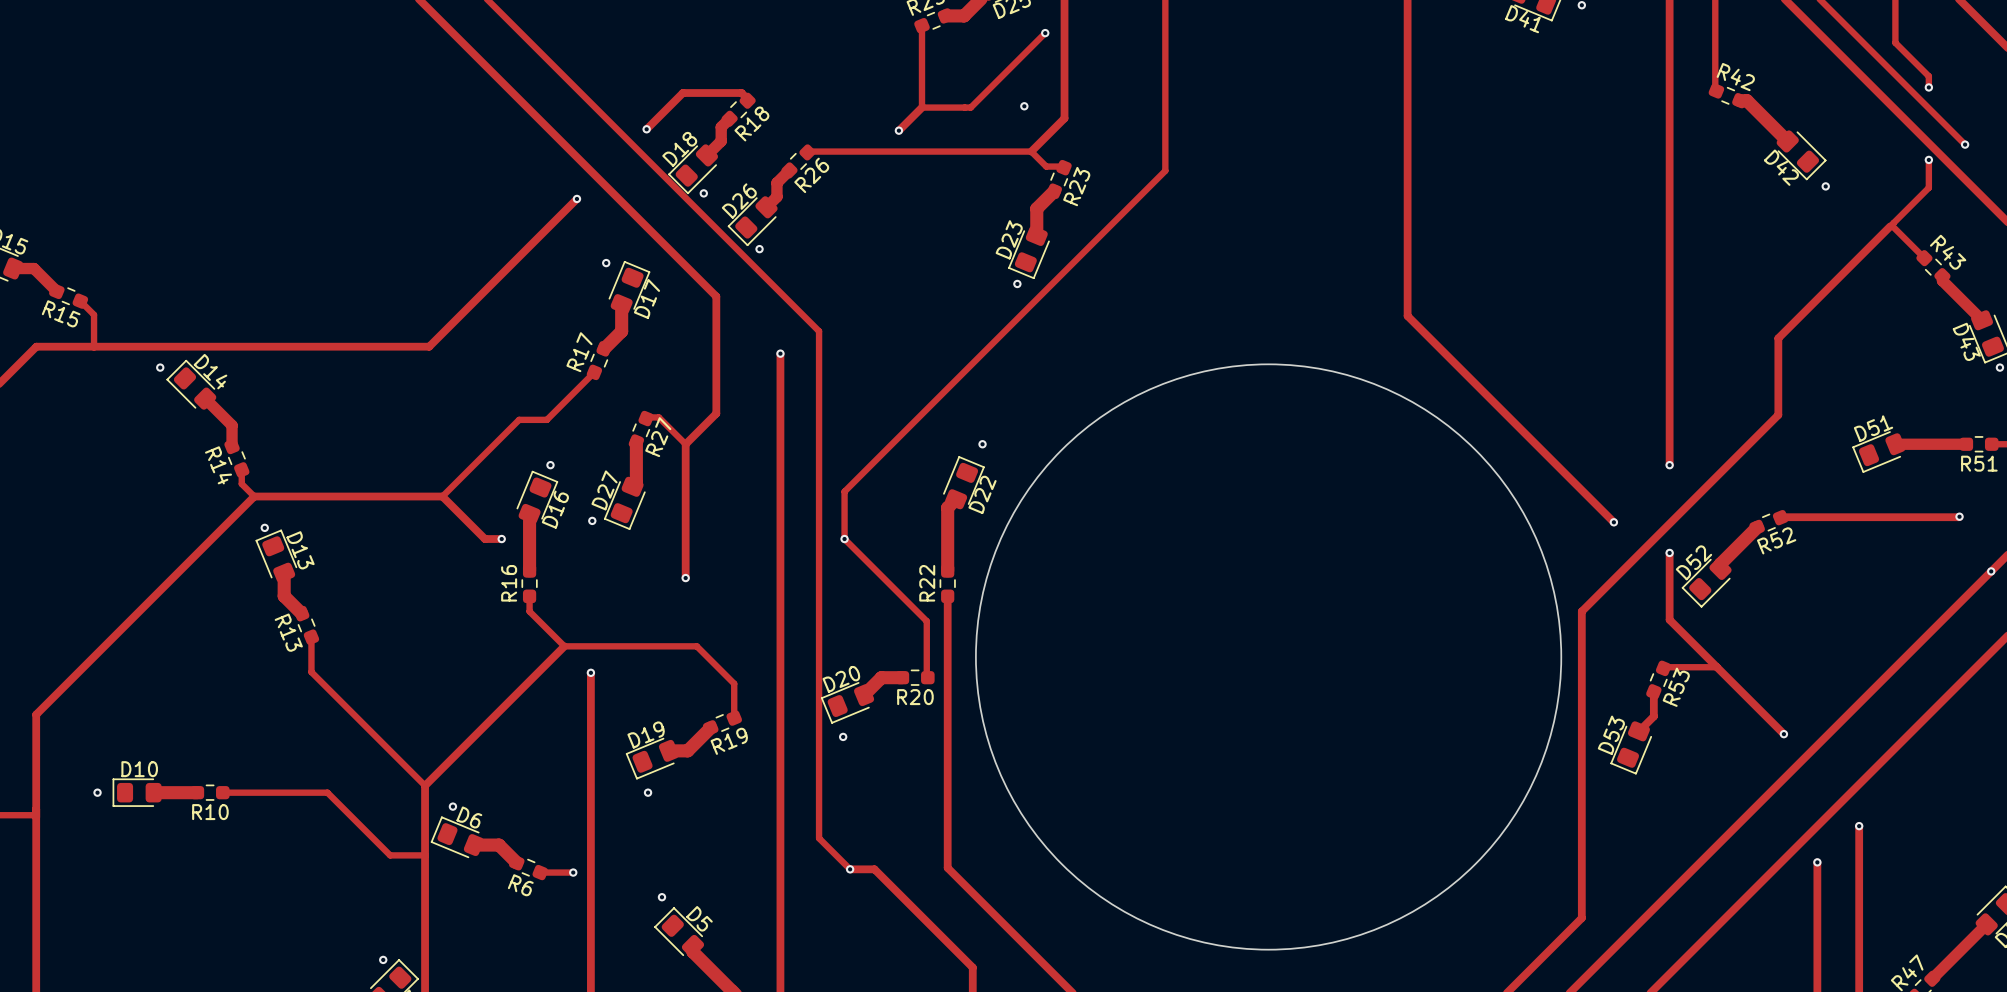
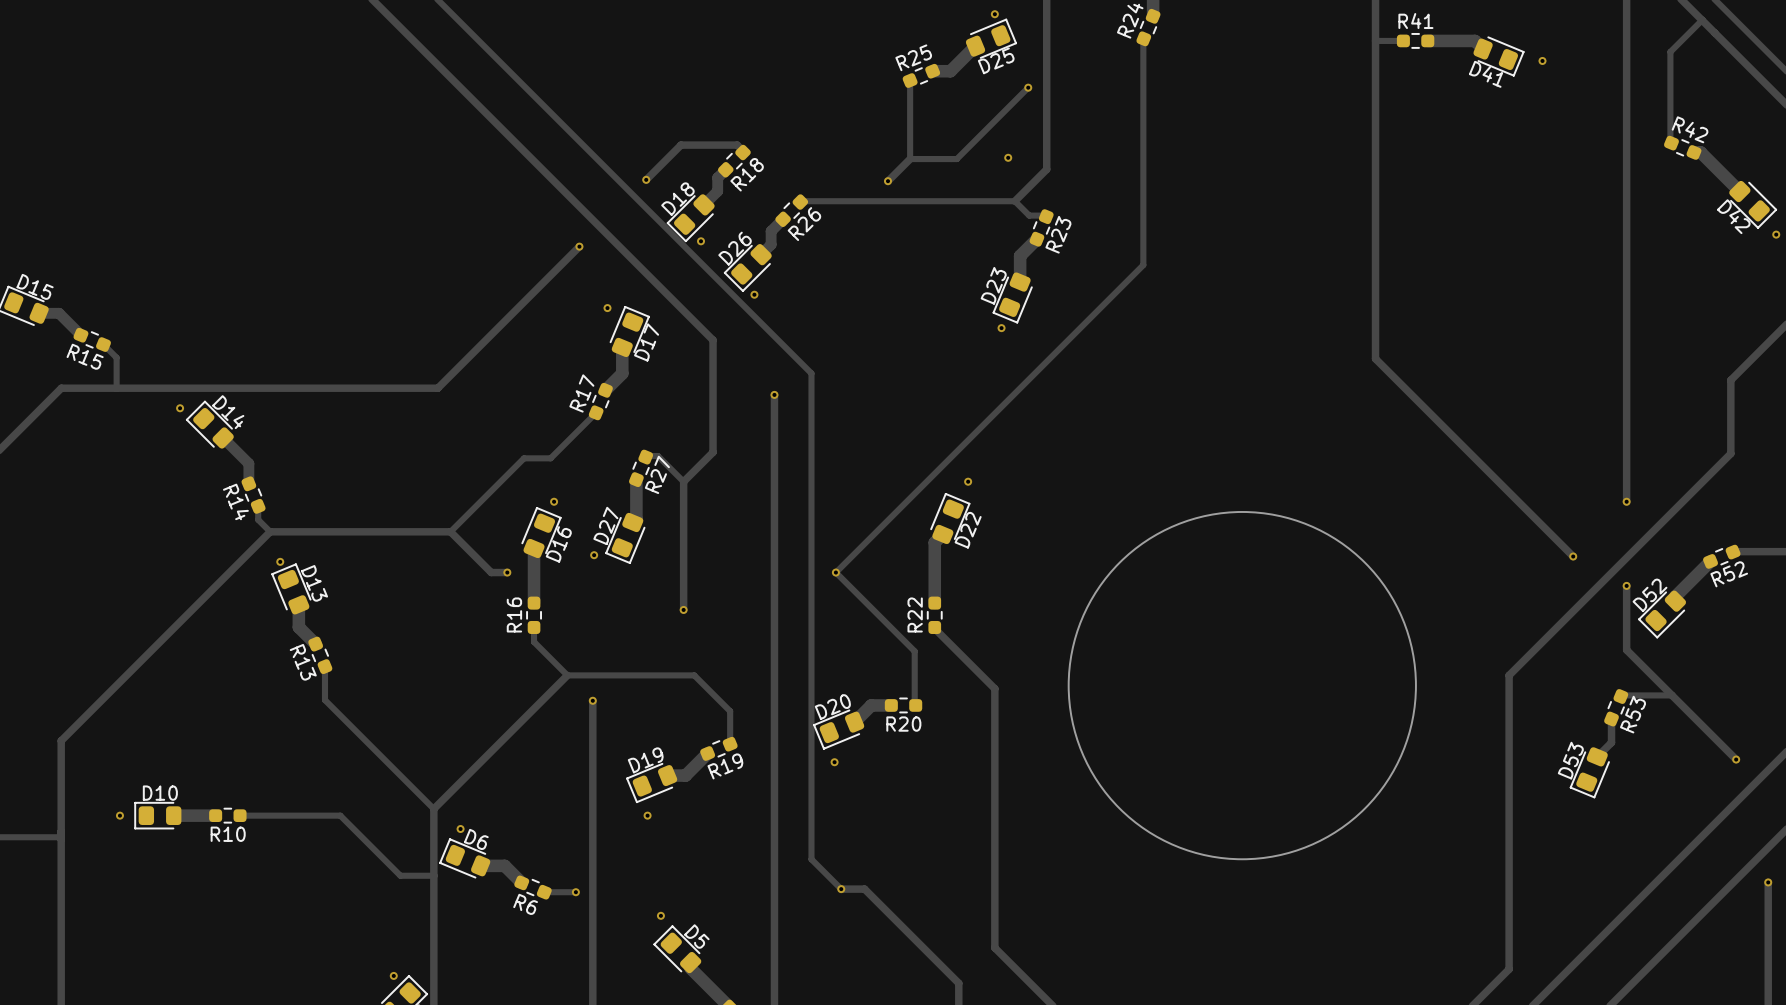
track: (1165, 170) (844, 491) (844, 539) -> (1143, 219) (1143, 265) (835, 572)
round board edge size: [975, 363, 1562, 951] -> [1068, 511, 1417, 860]
track: (947, 597) (947, 867) (1010, 930) -> (934, 628) (994, 688) (994, 947)
track: (1581, 611) (1581, 918) (1546, 952) -> (1542, 642) (1509, 675) (1509, 969)

